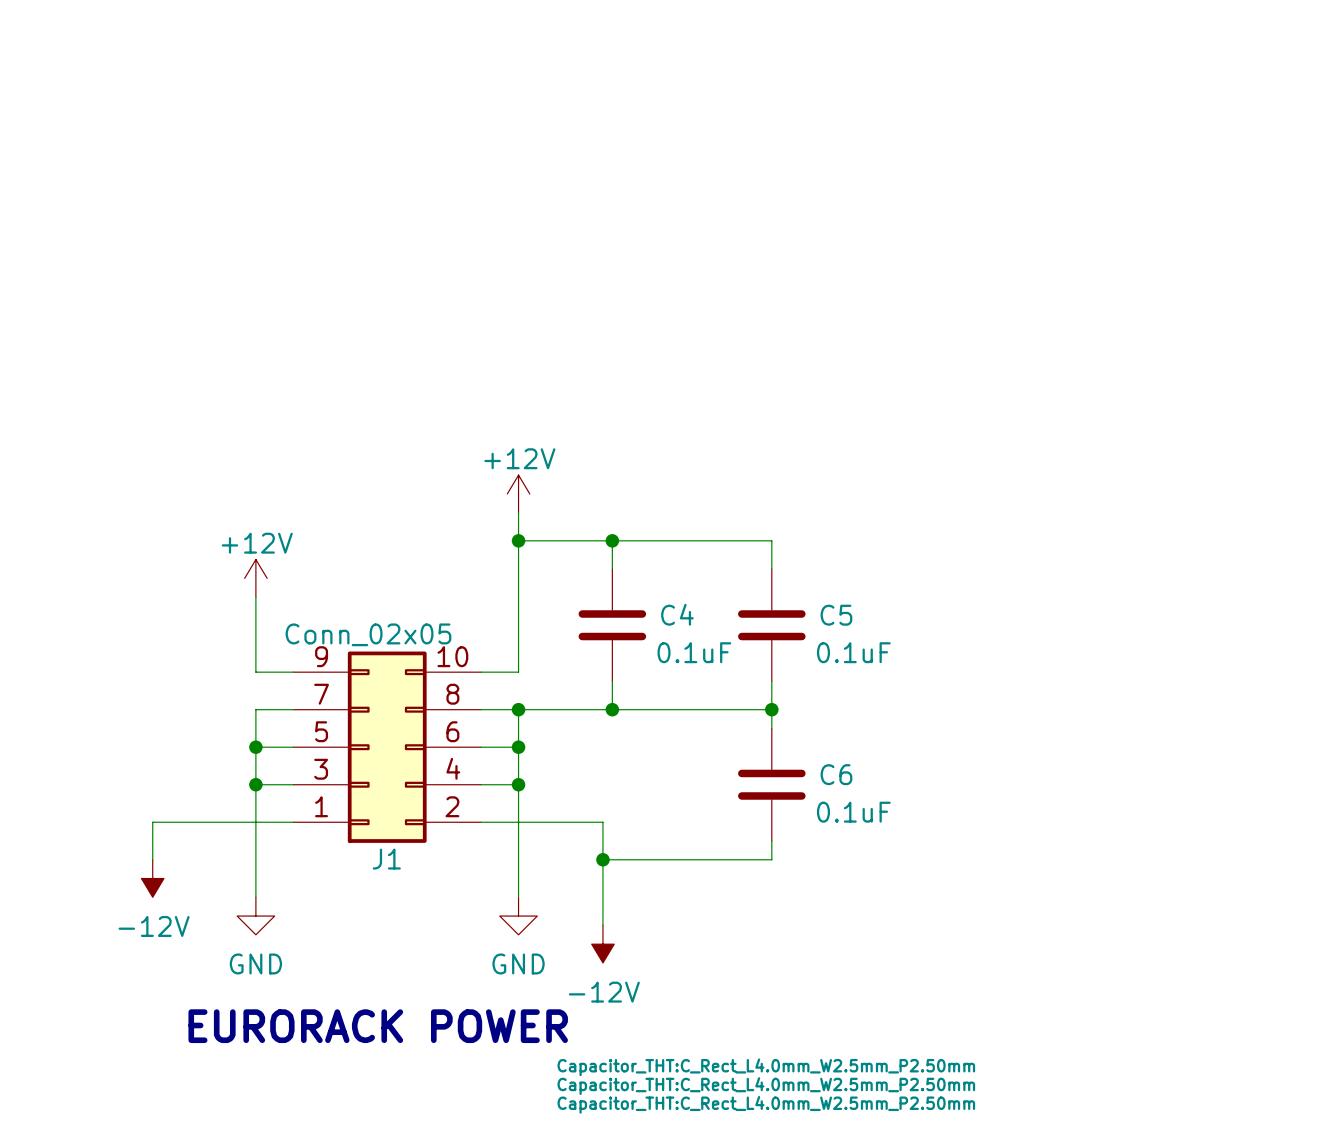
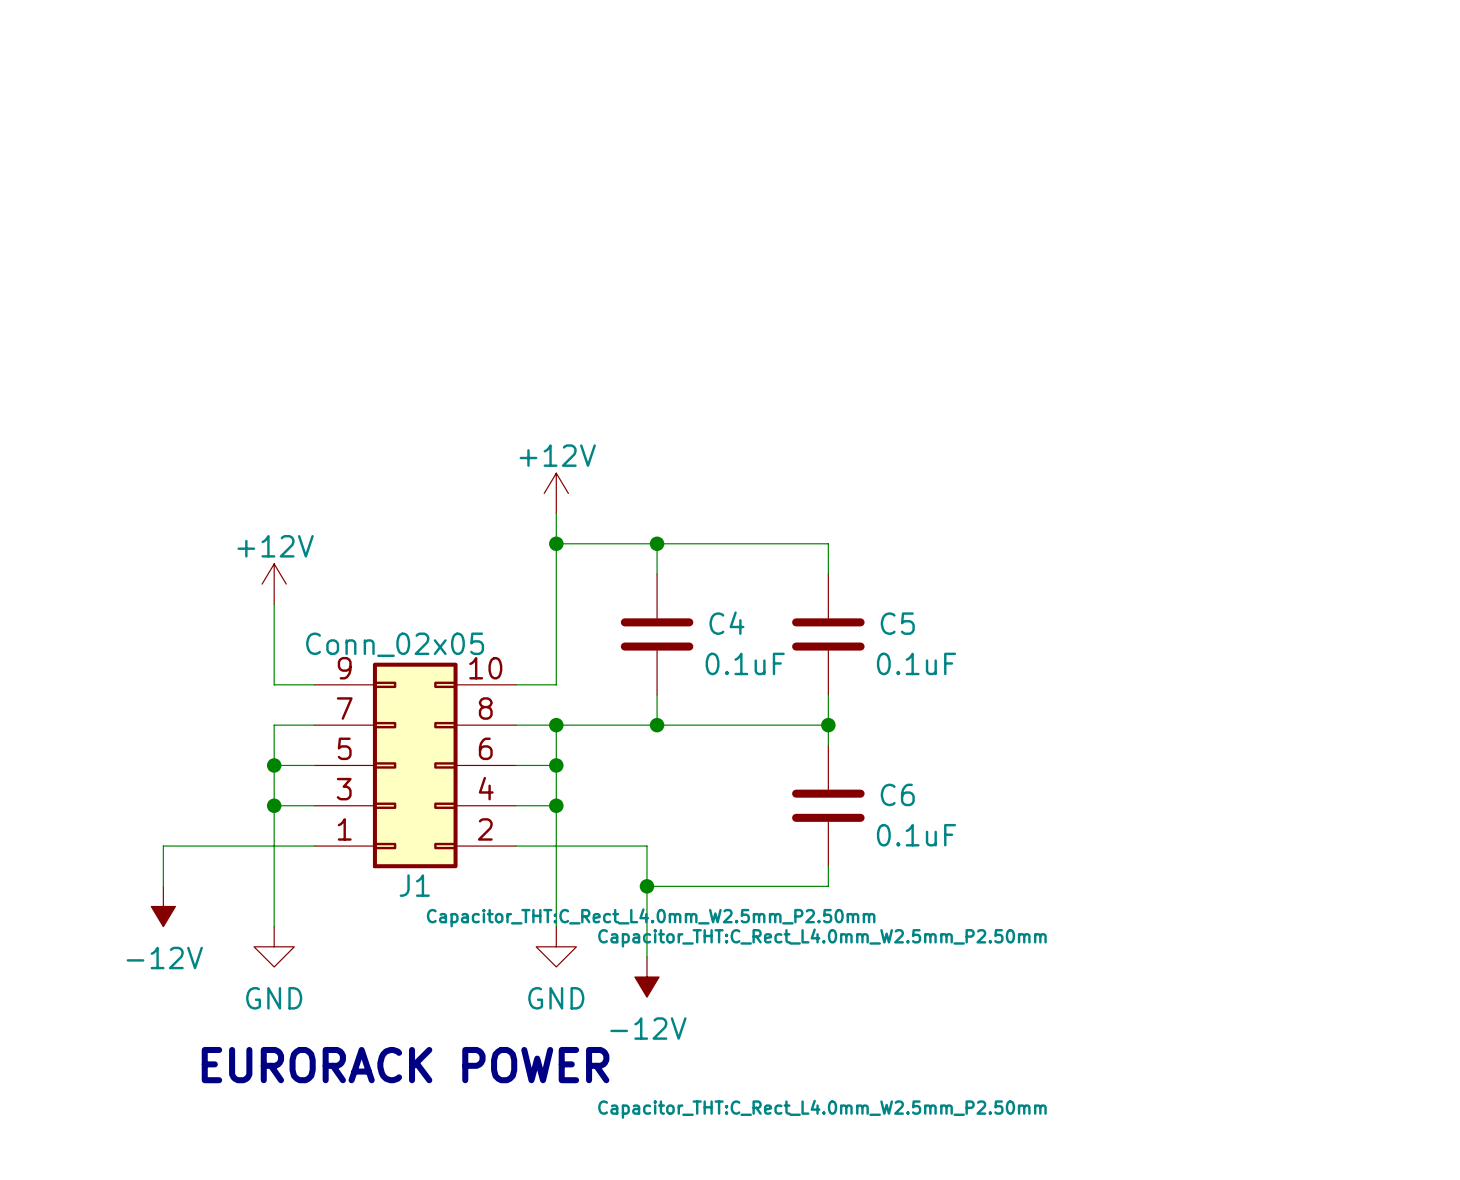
C4 text position: Capacitor_THT:C_Rect_L4.0mm_W2.5mm_P2.50mm (766, 1086) -> Capacitor_THT:C_Rect_L4.0mm_W2.5mm_P2.50mm (651, 917)
C5 text position: Capacitor_THT:C_Rect_L4.0mm_W2.5mm_P2.50mm (766, 1104) -> Capacitor_THT:C_Rect_L4.0mm_W2.5mm_P2.50mm (822, 938)

